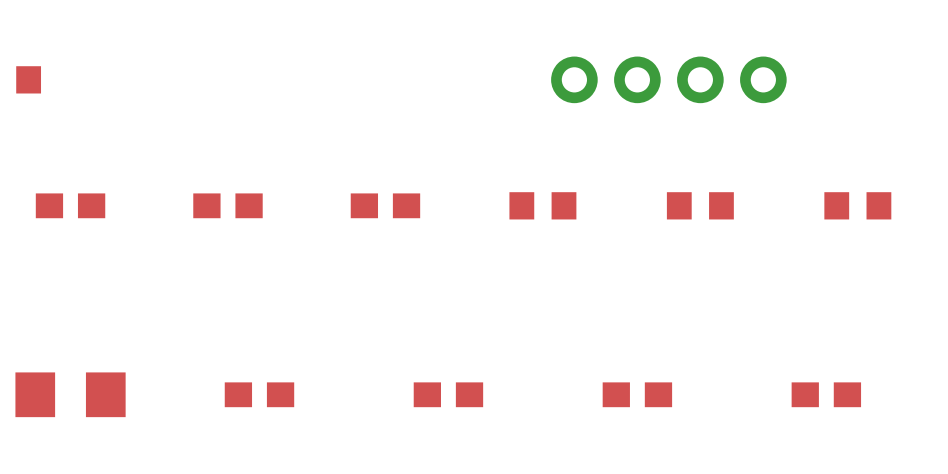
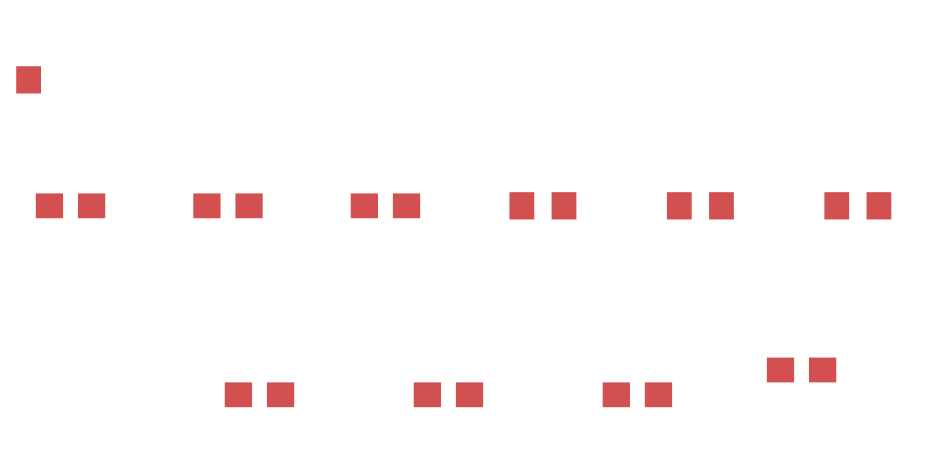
part: (668, 79) -> none
part: (70, 394) -> none
part position: (826, 394) -> (801, 369)

